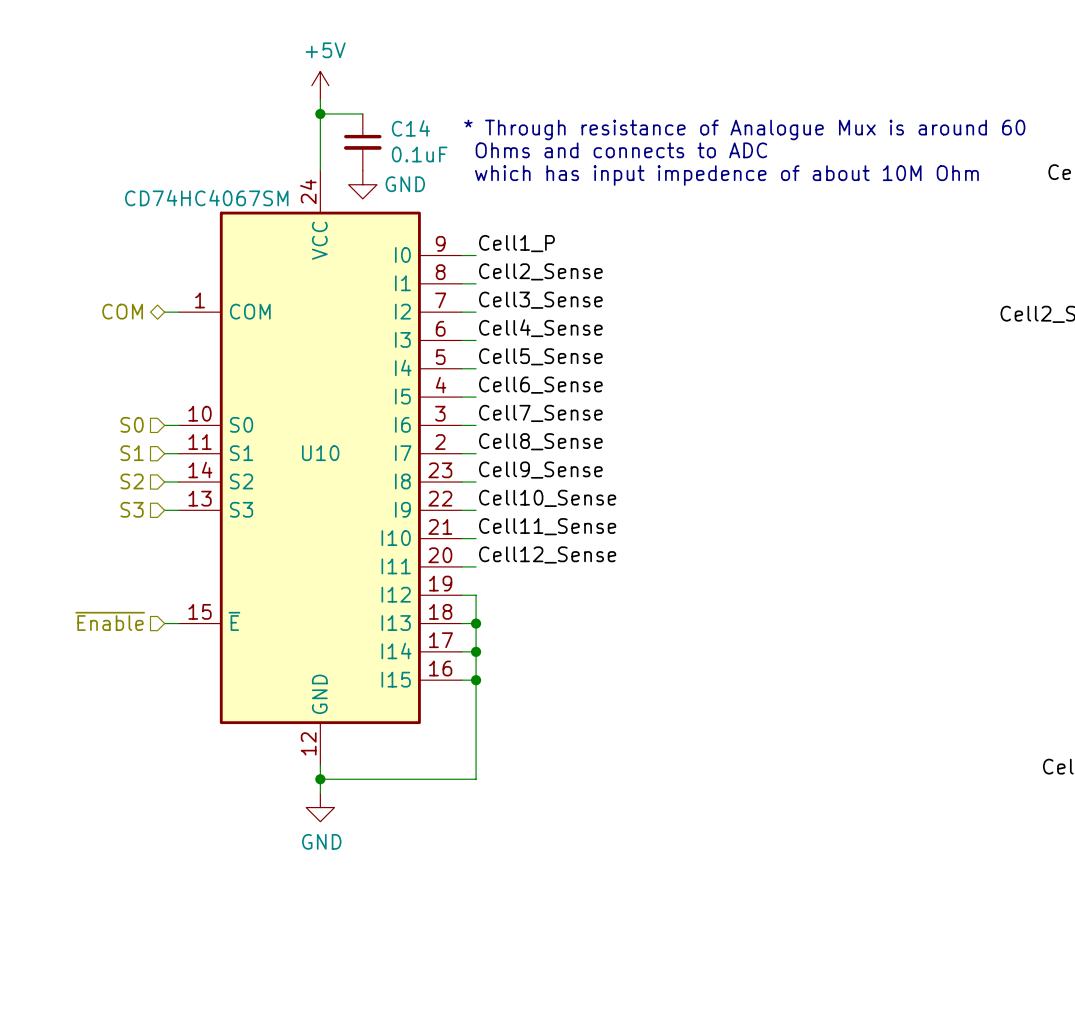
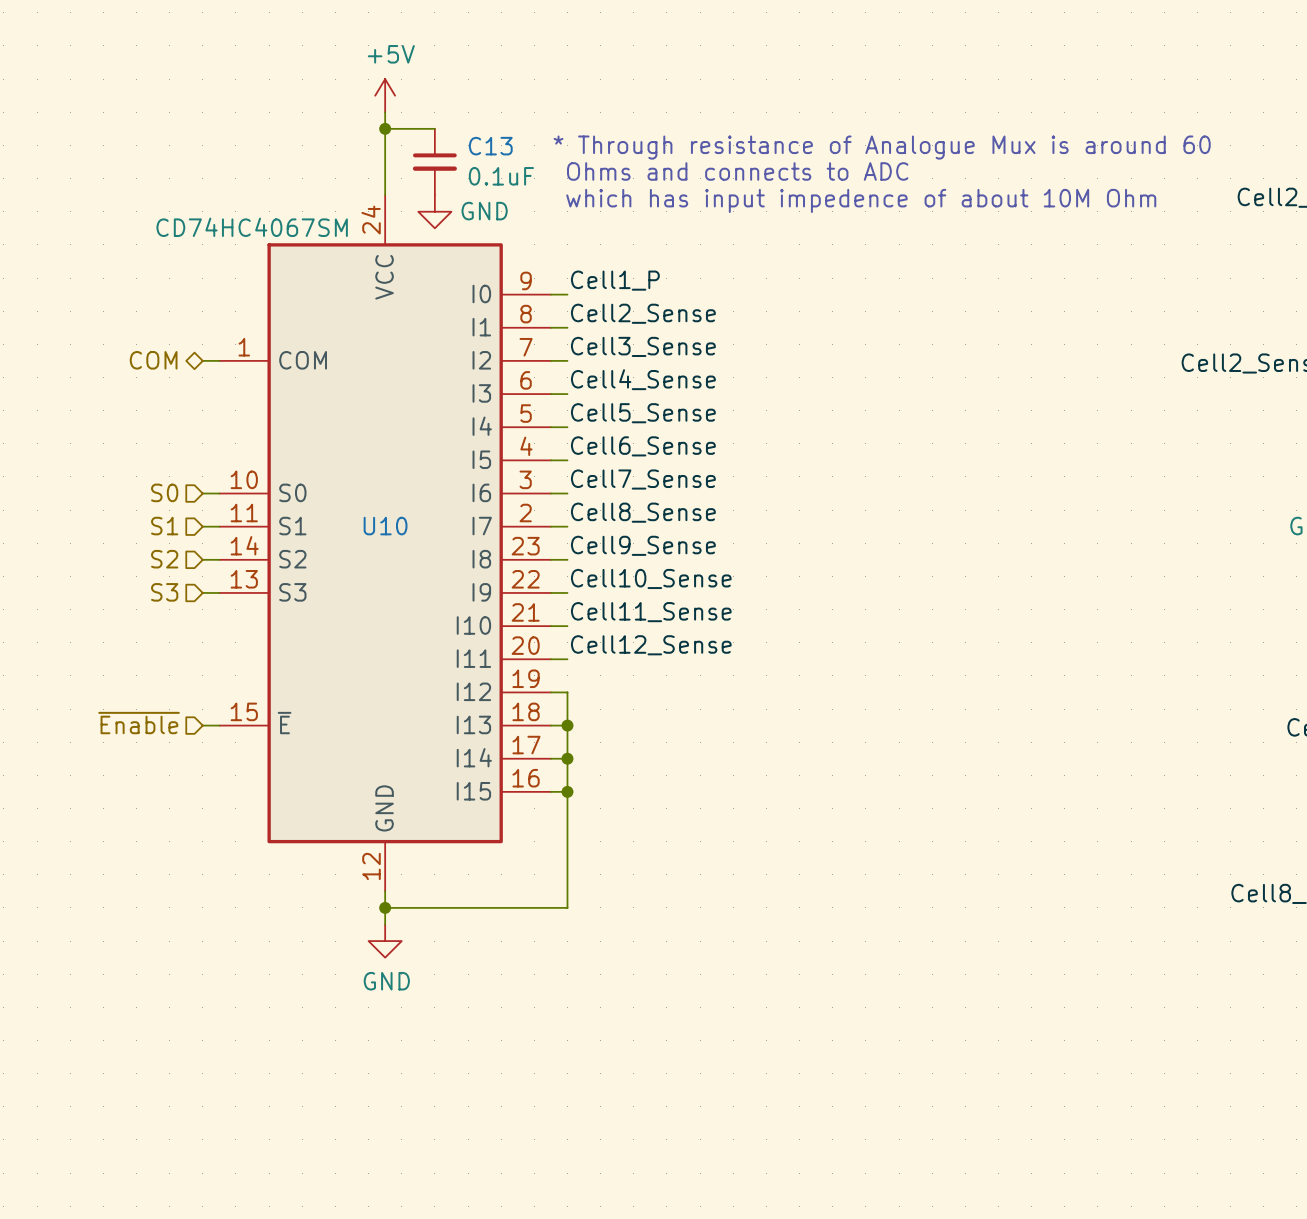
C14 name: C14 (410, 128) -> C13 (490, 146)

